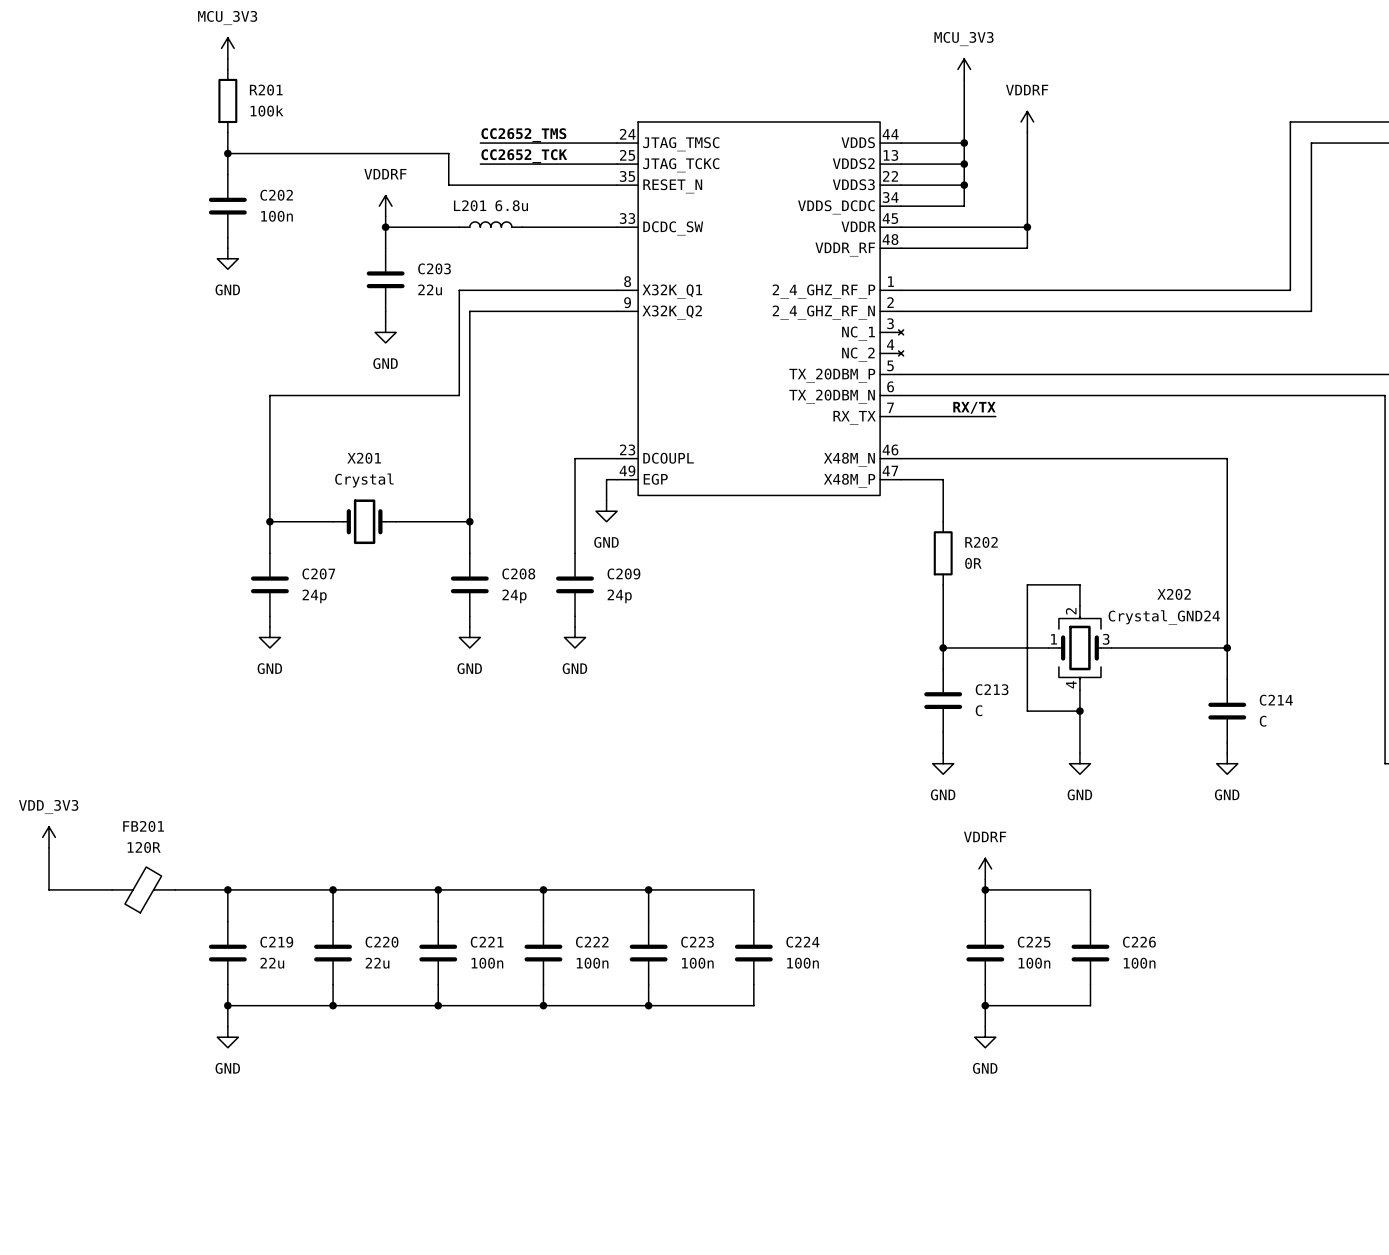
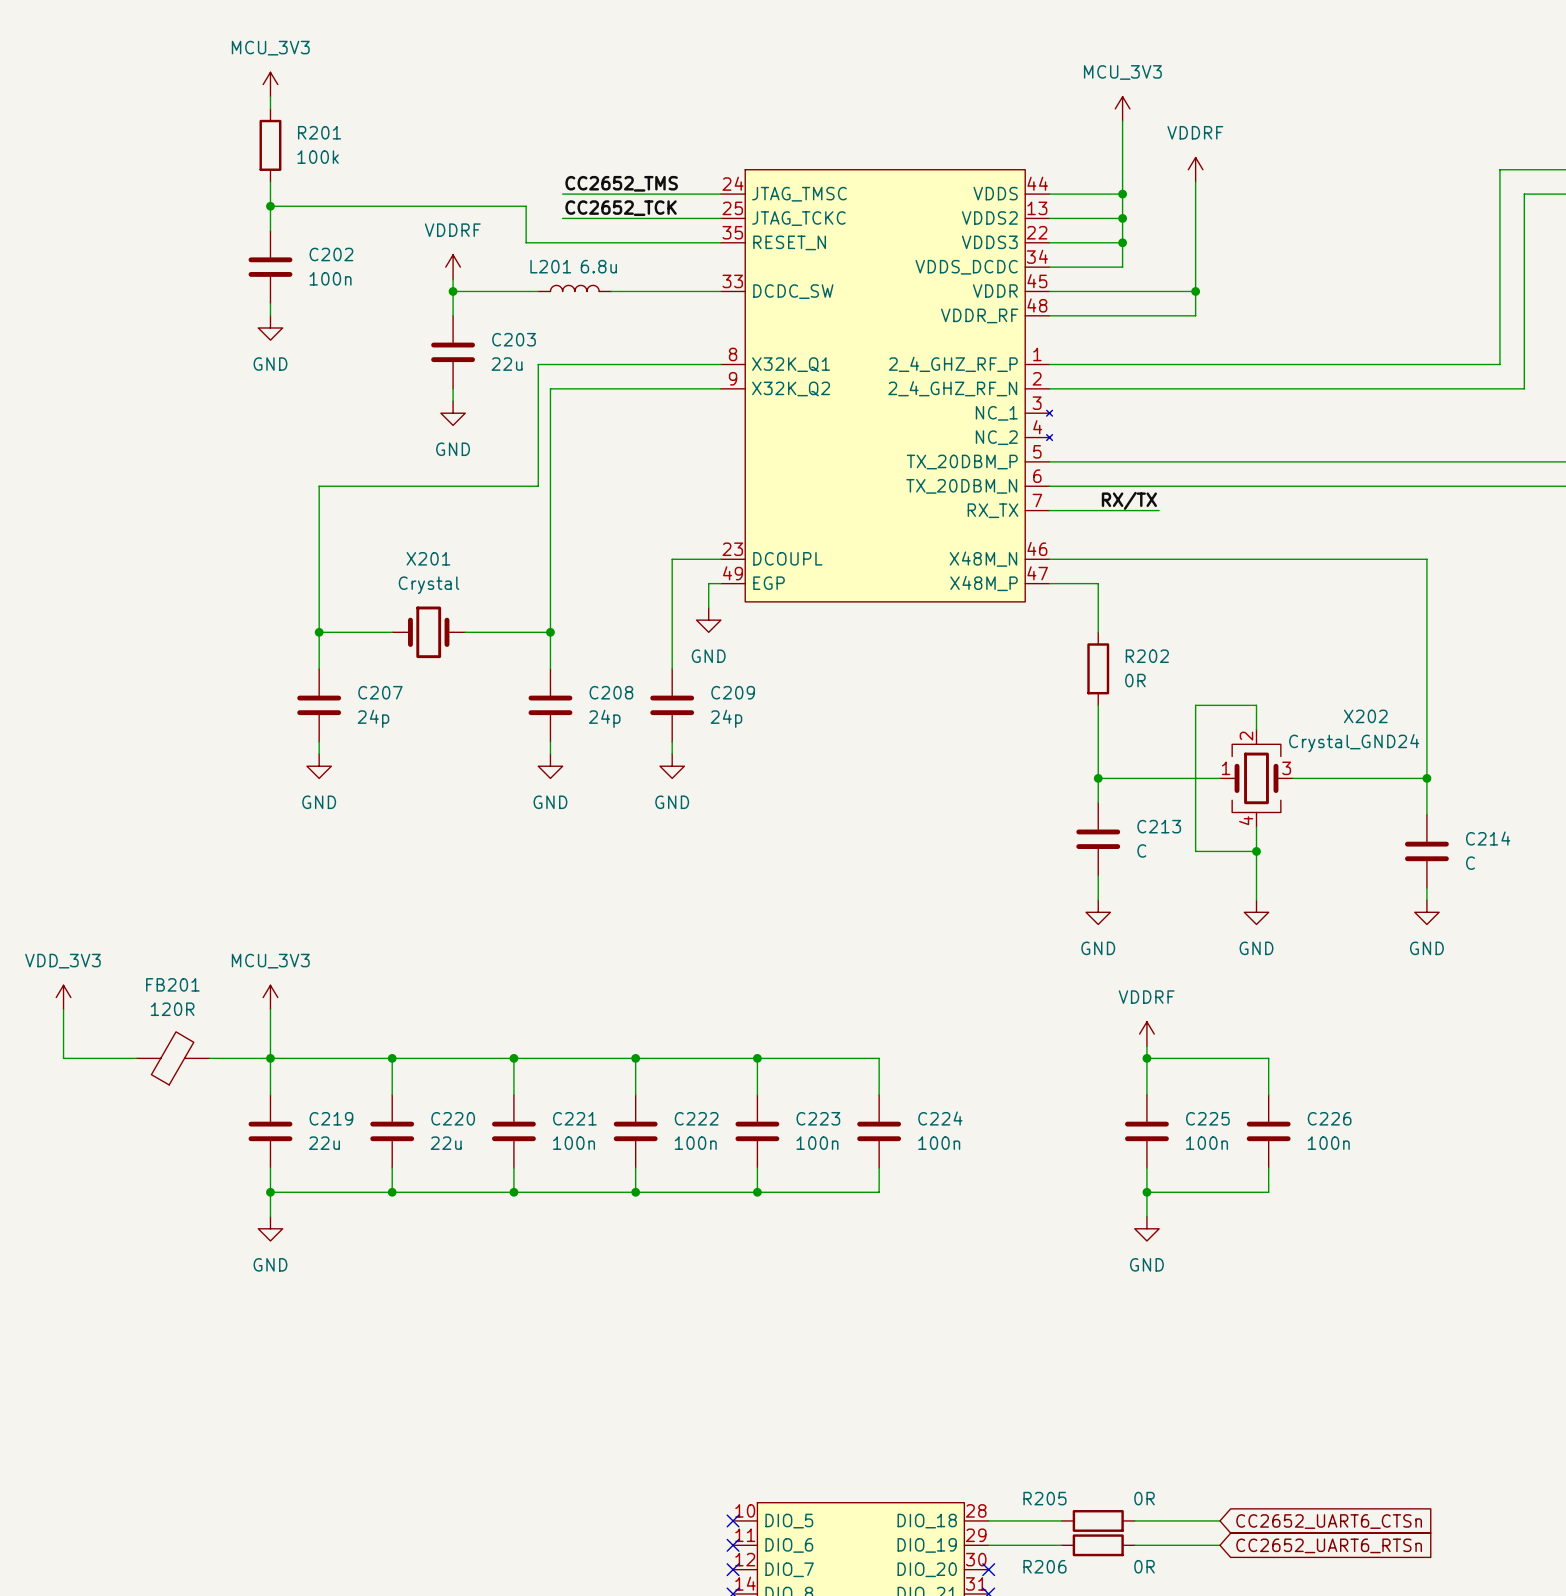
power symbol: none -> MCU_3V3 (270, 997)
wire: none -> (270, 1009) (270, 1058)

